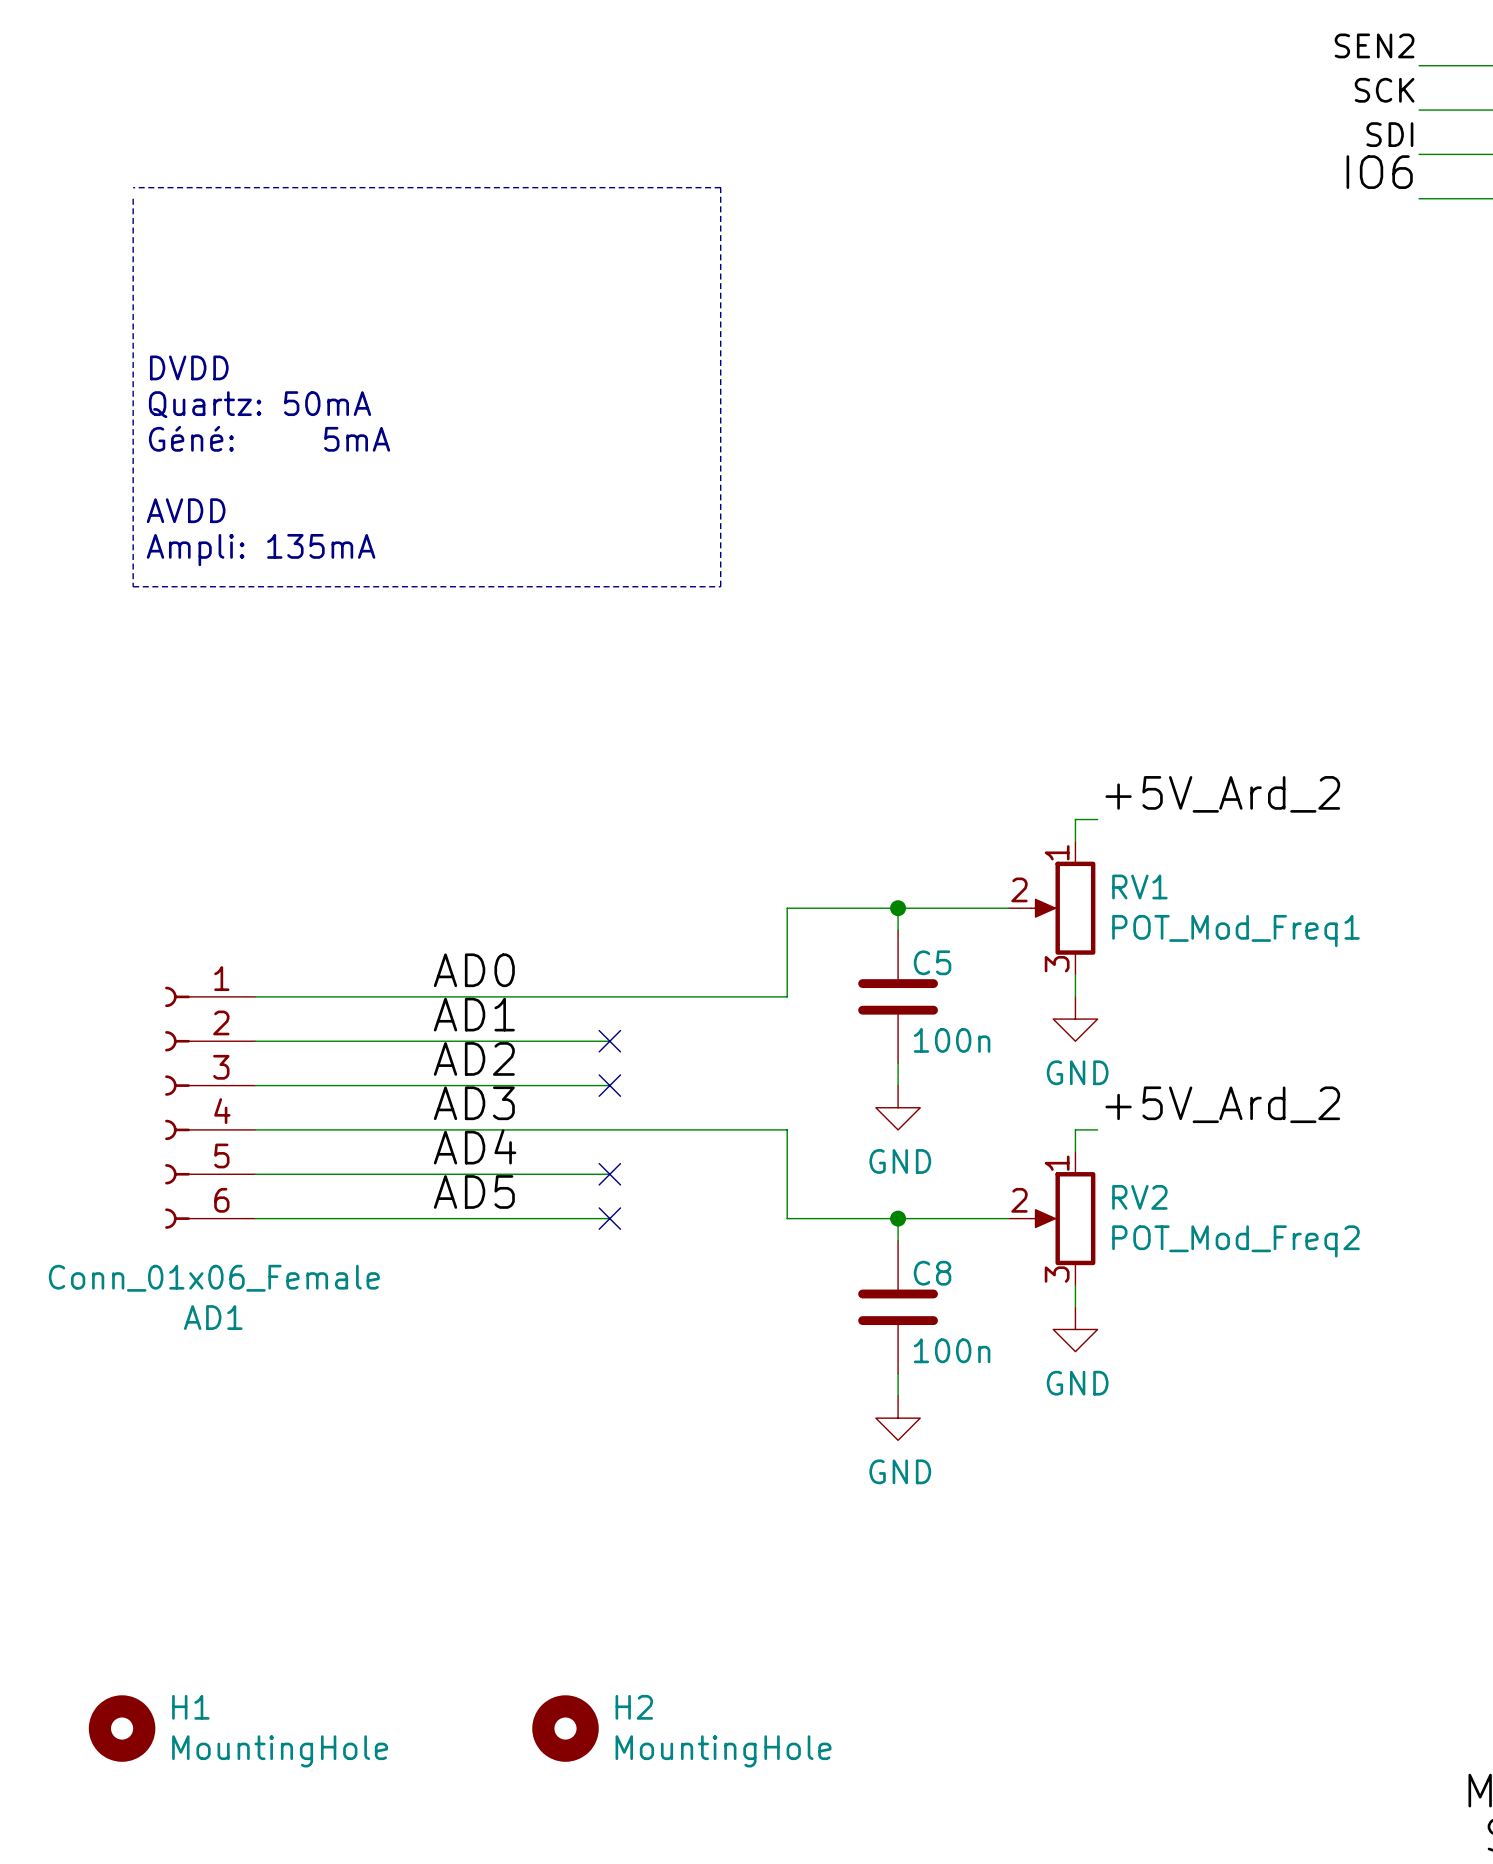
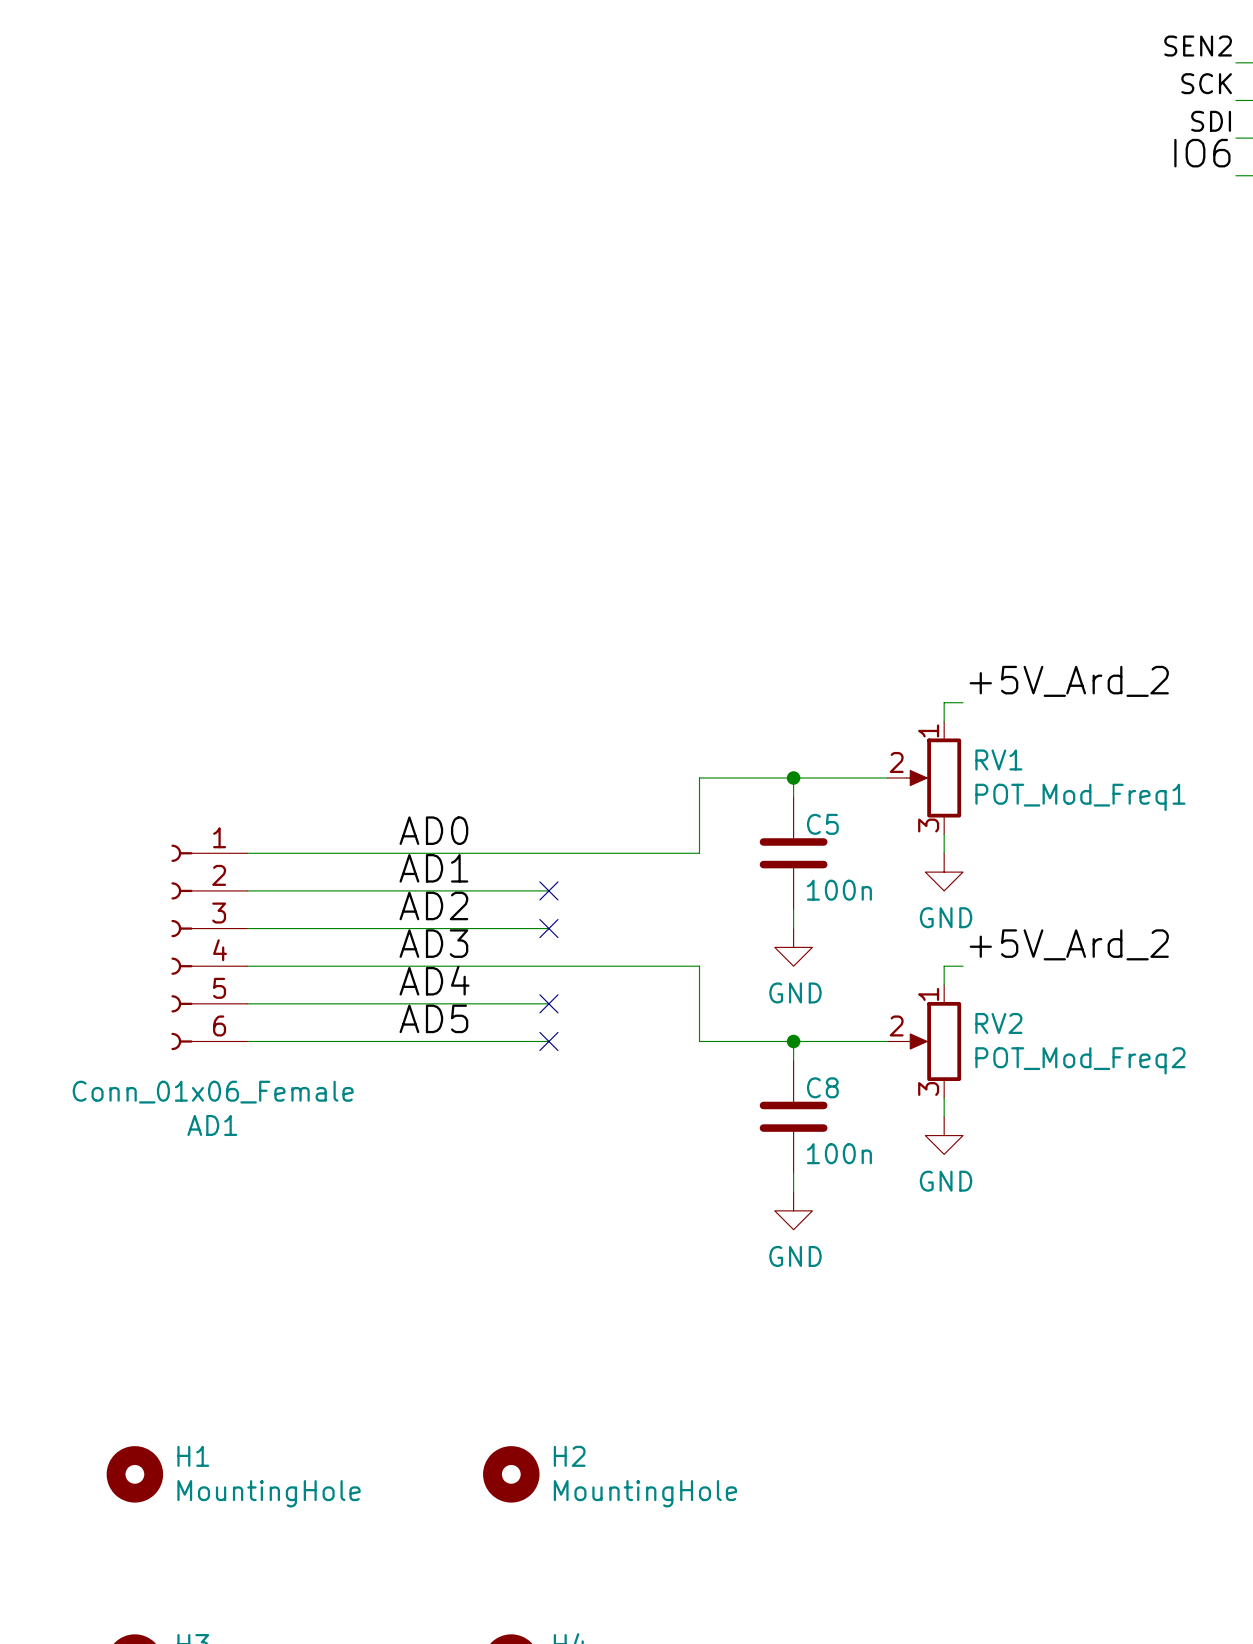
line: (133, 187) (720, 187) (720, 586) (133, 586) (133, 198) -> none
text: DVDD (189, 367) -> none
text: Quartz: 50mA (260, 404) -> none
text: Géné: 5mA (269, 438) -> none
text: AVDD (186, 510) -> none
text: Ampli: 135mA (261, 550) -> none

